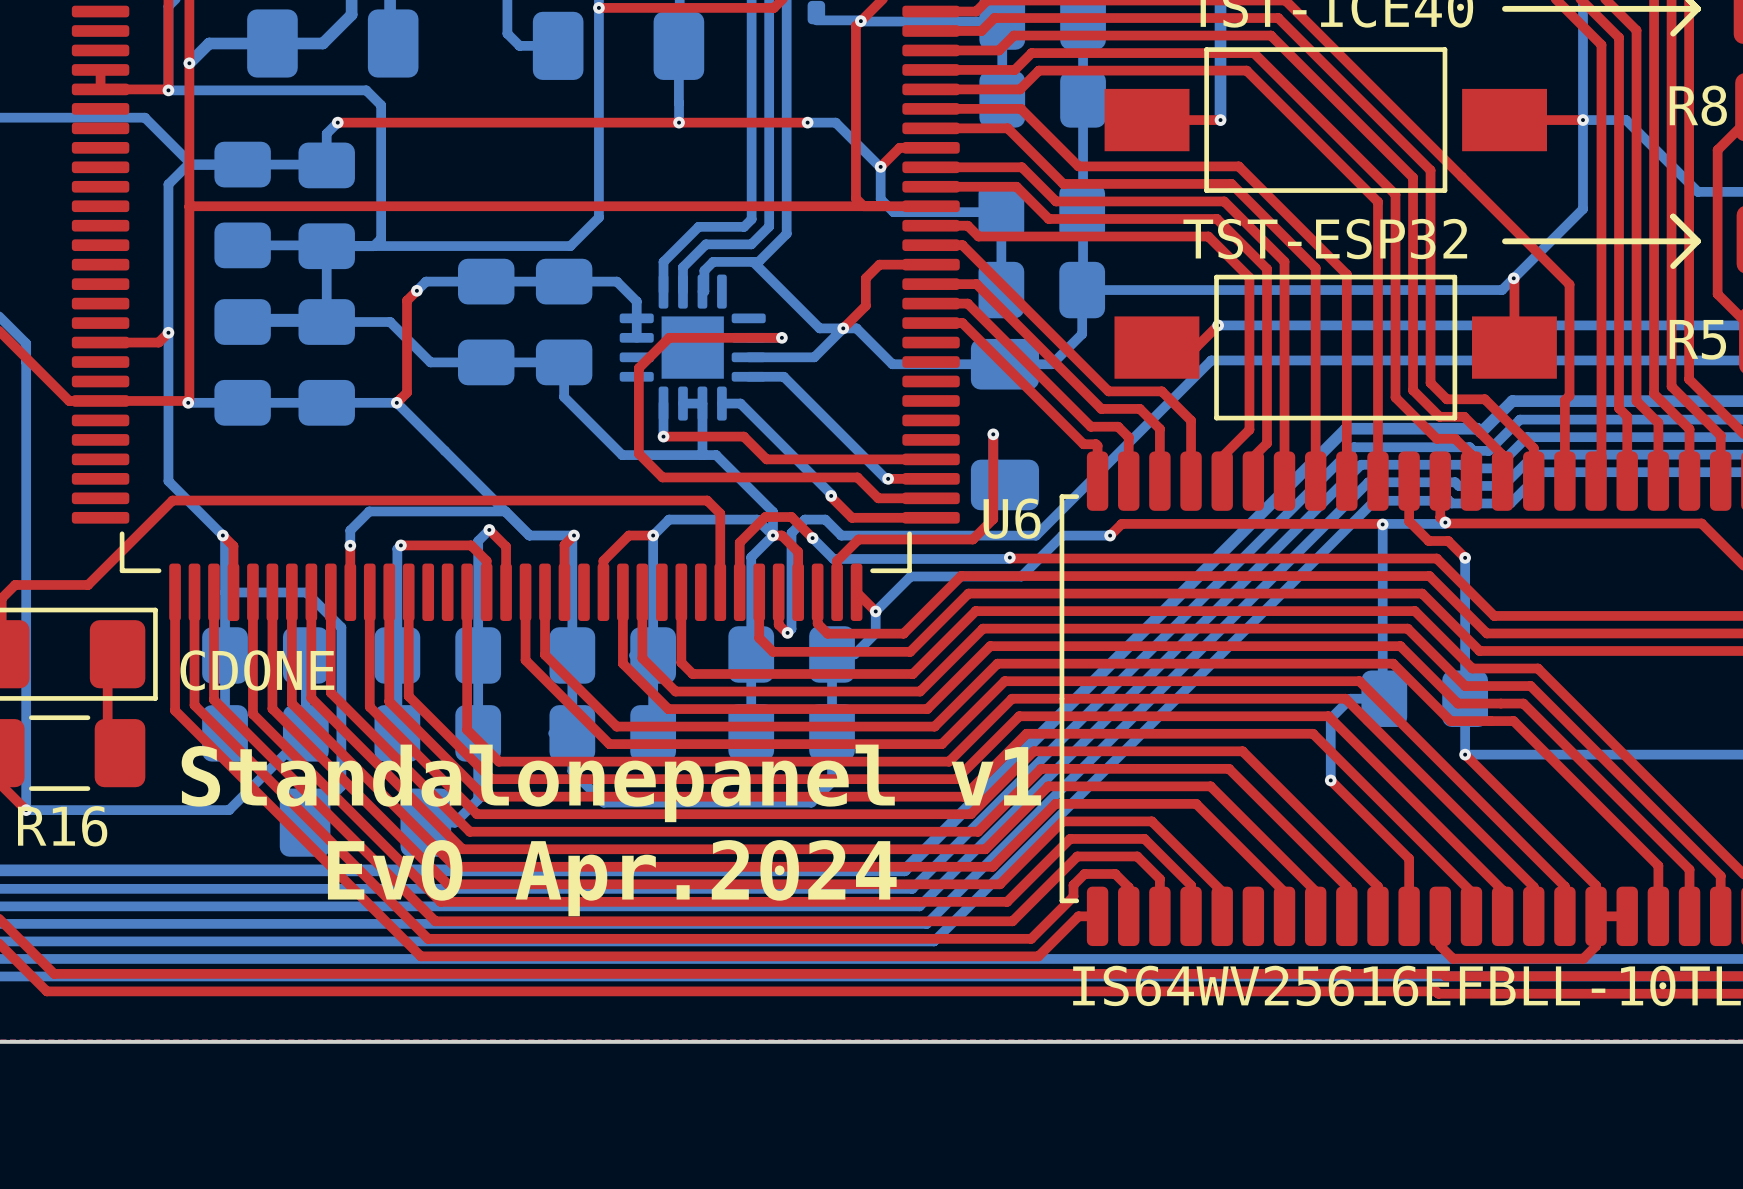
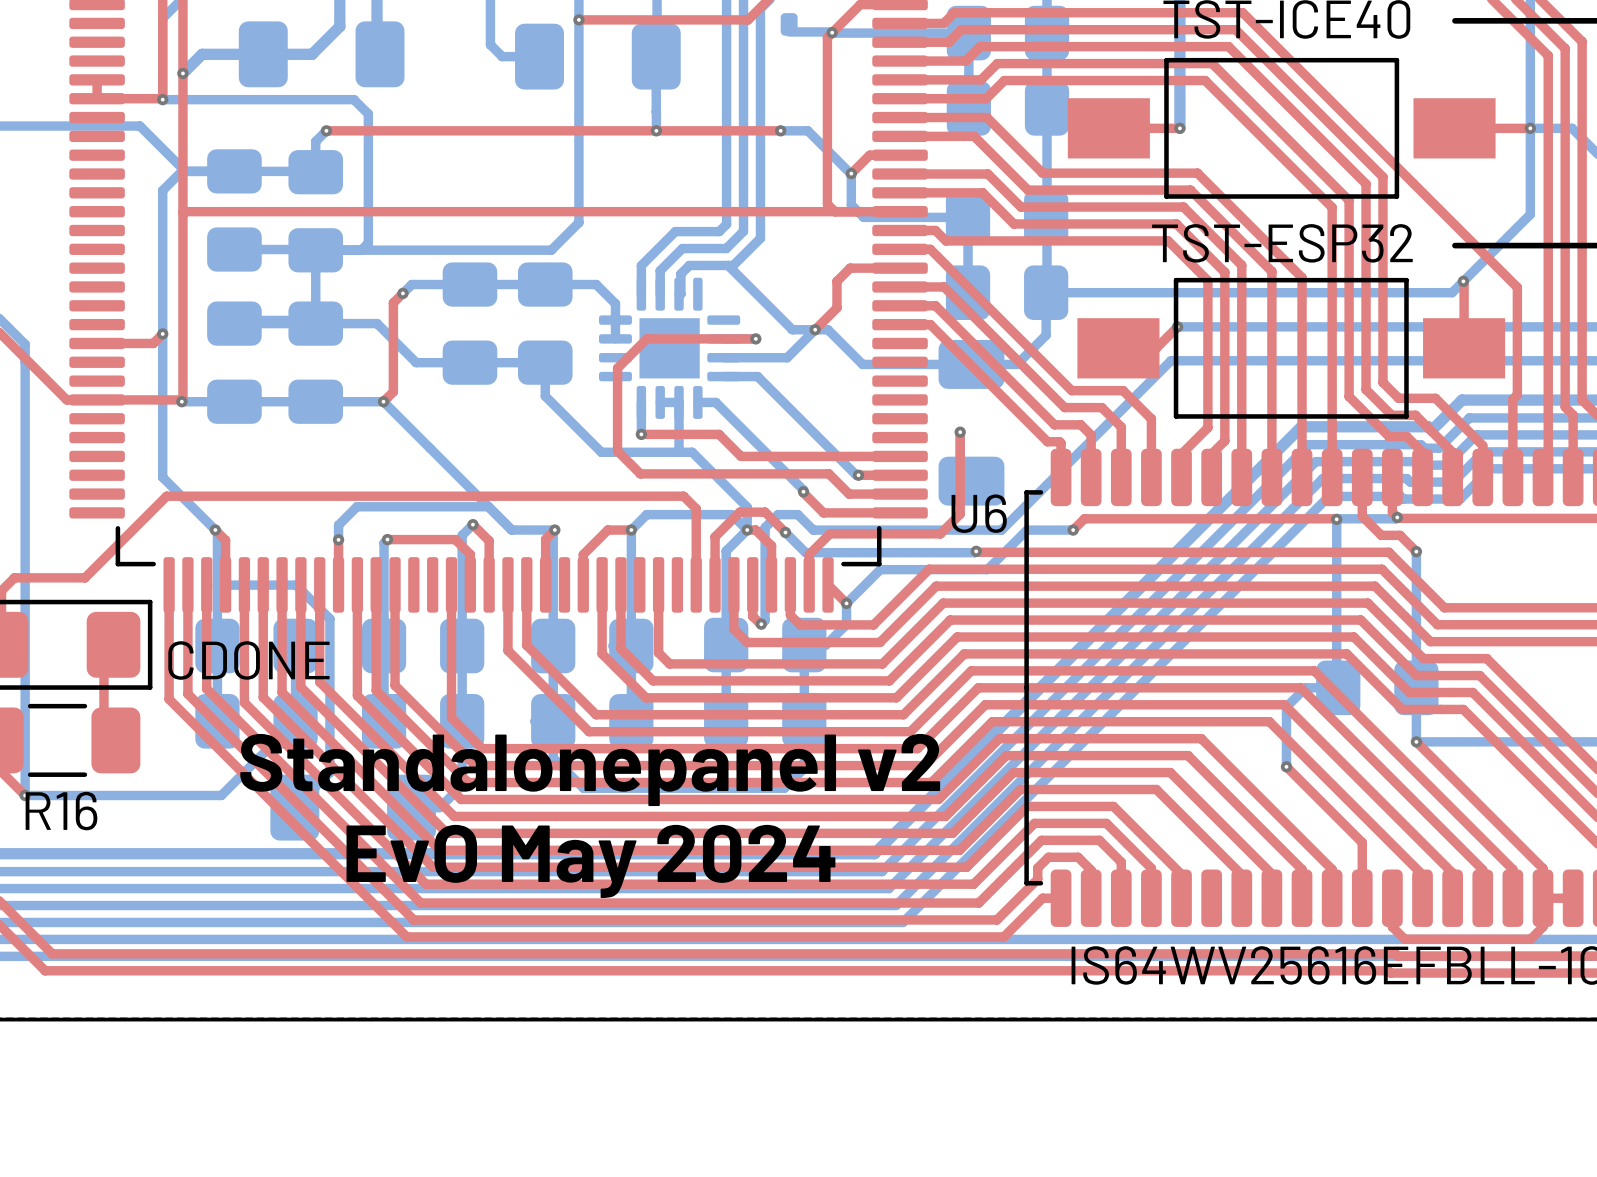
text: Standalonepanel v1 (611, 783) -> Standalonepanel v2 (590, 769)
text: EvO Apr.2024 (612, 878) -> EvO May 2024 (590, 861)

